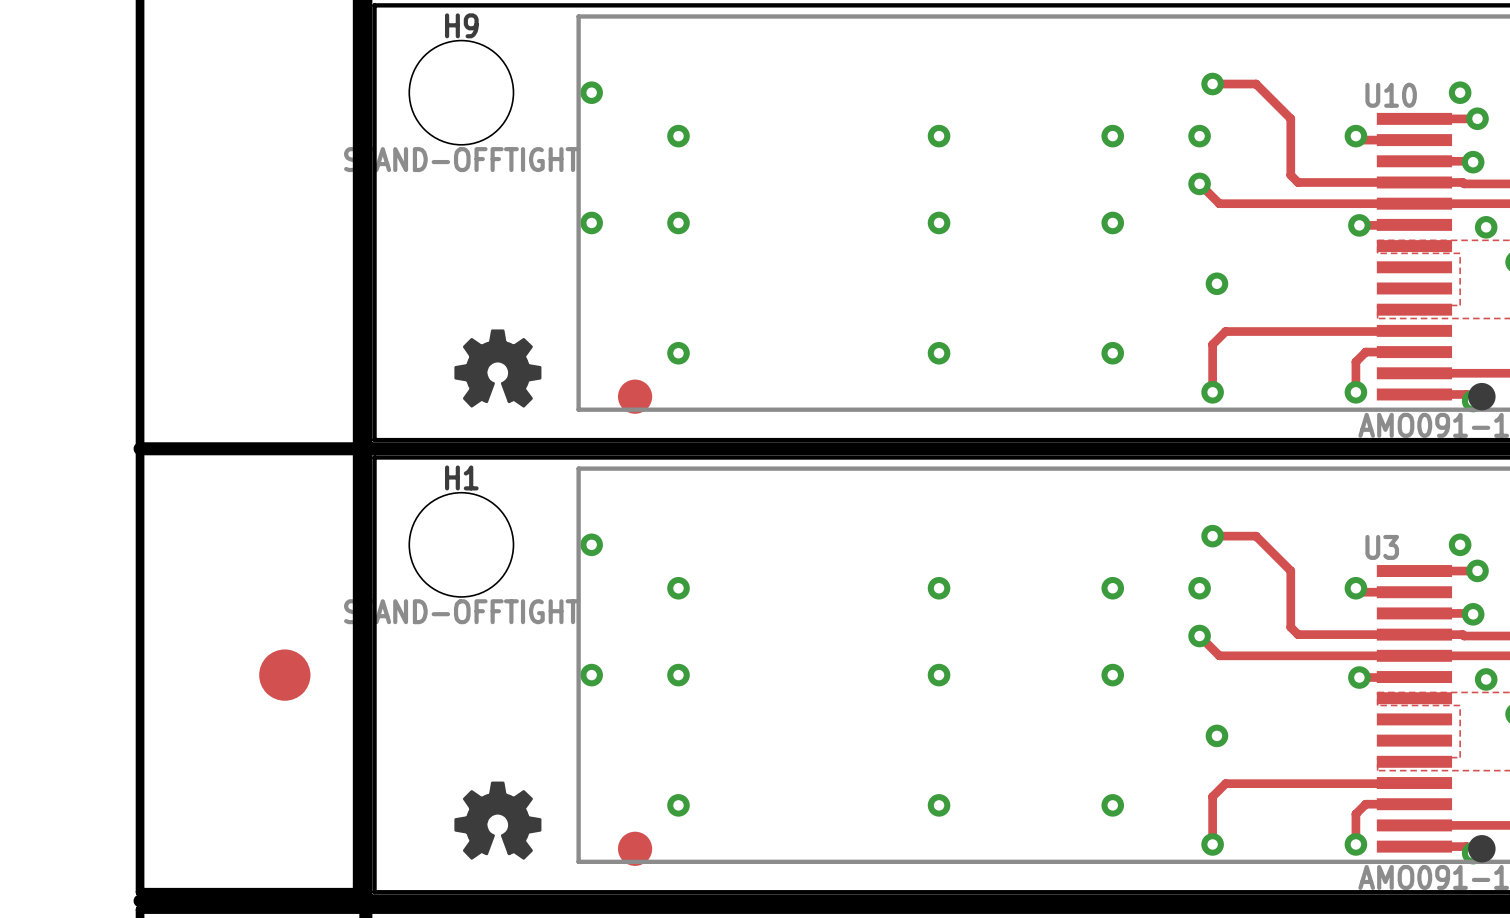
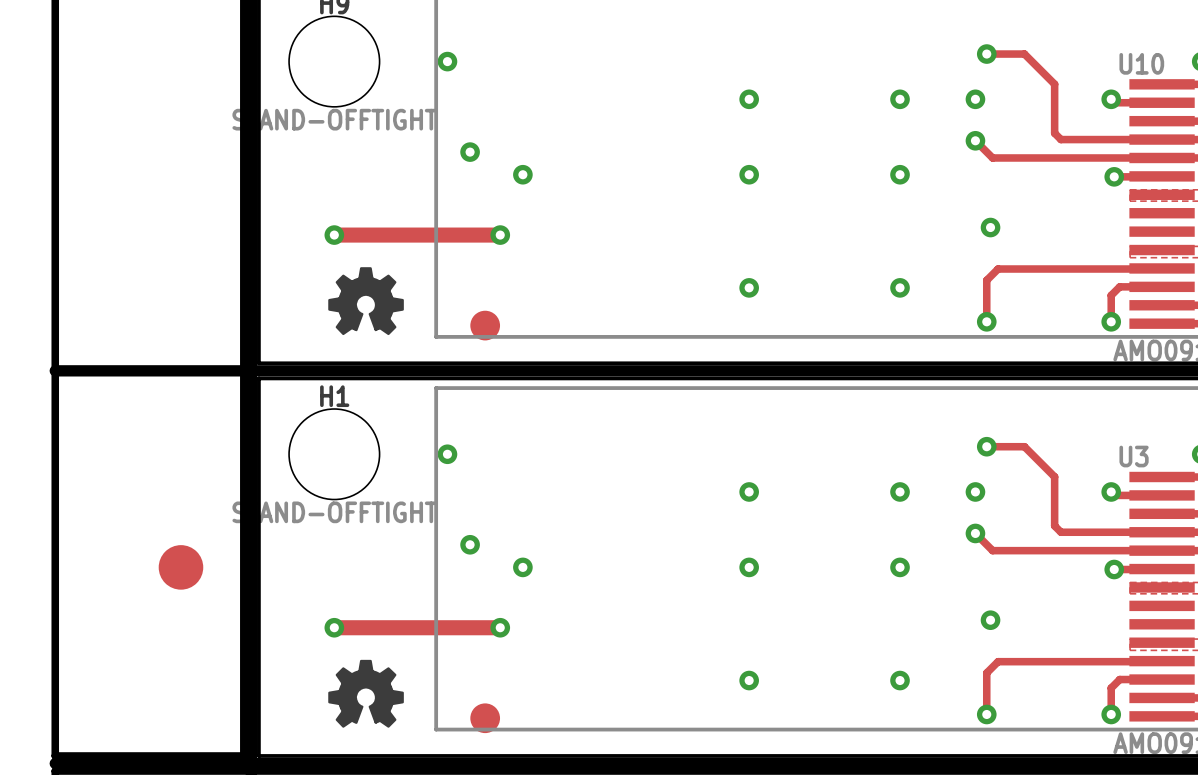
via: (678, 136) -> none
via position: (591, 222) -> (470, 152)
track: none -> (334, 235) (500, 235)
via: none -> (334, 235)
via: none -> (500, 235)
via: (678, 353) -> none
via: (678, 588) -> none
via position: (591, 675) -> (470, 544)
track: none -> (334, 627) (500, 627)
via: none -> (334, 627)
via: none -> (500, 627)
via: (678, 805) -> none

